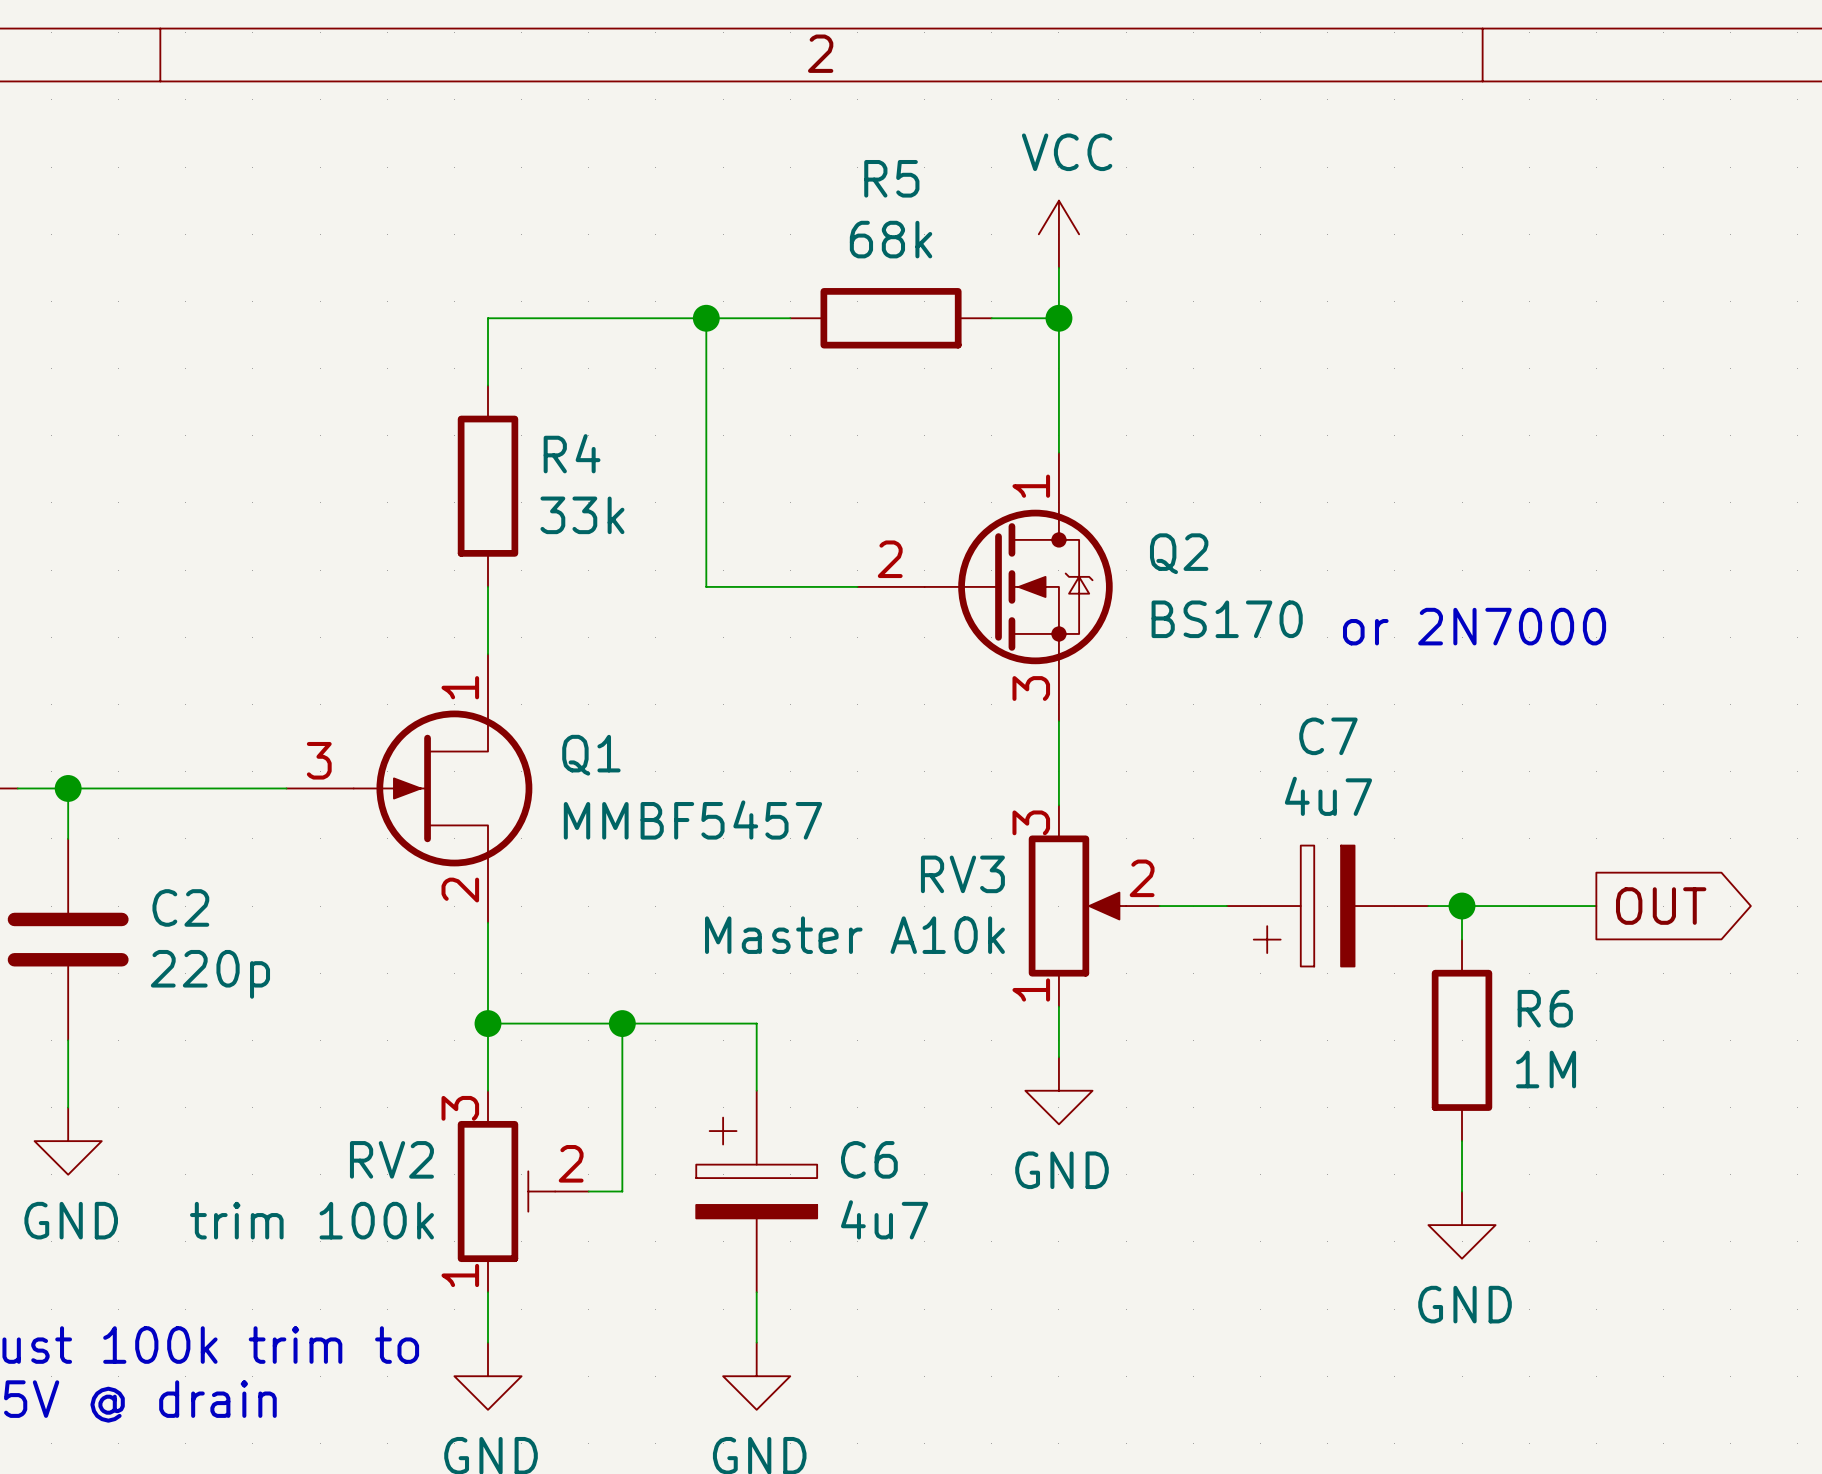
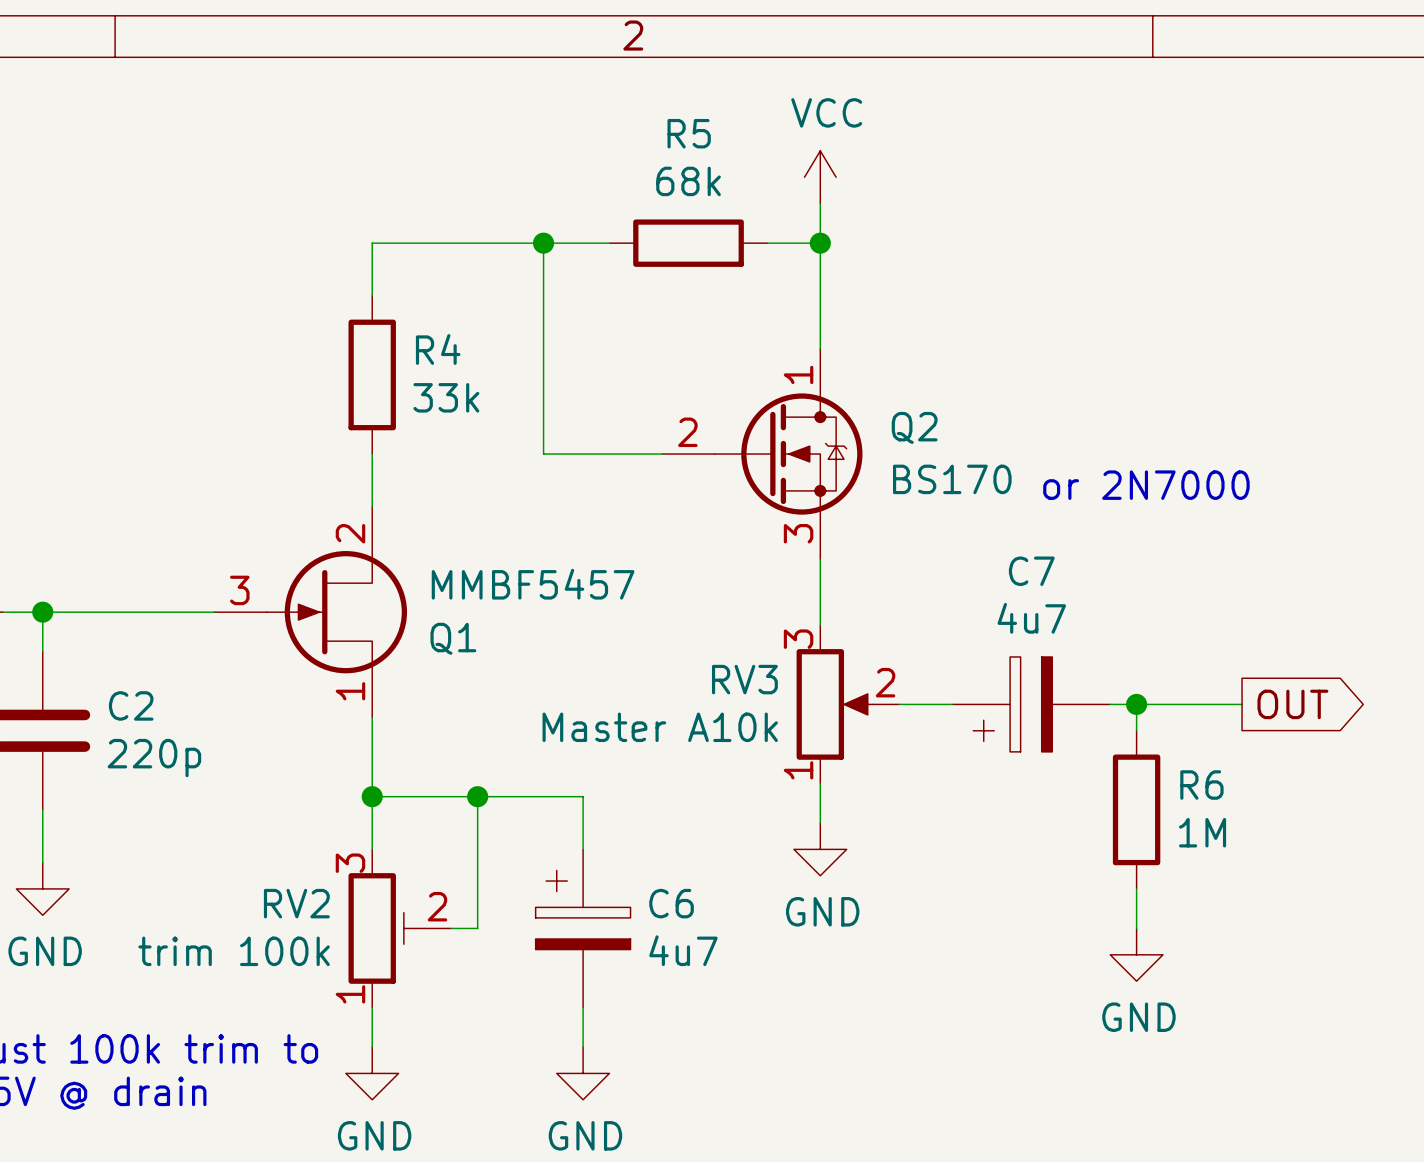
Q1 flip: as is (442, 788) -> up-down (336, 612)

